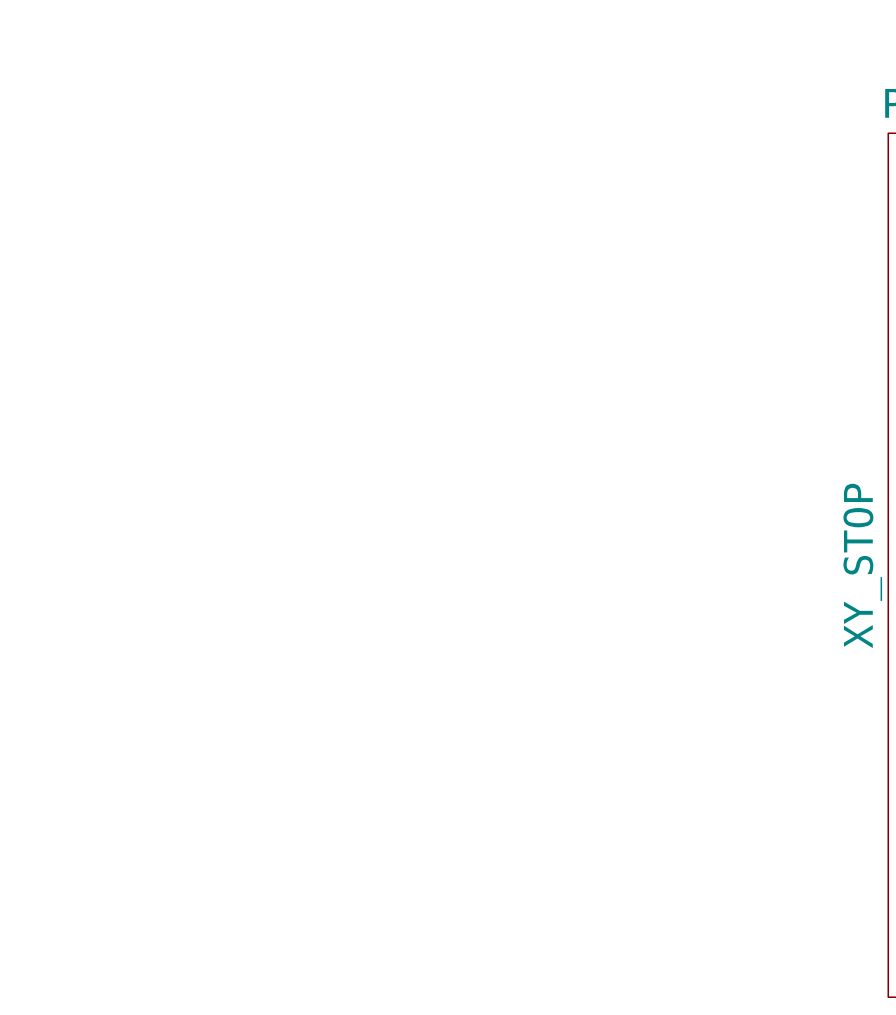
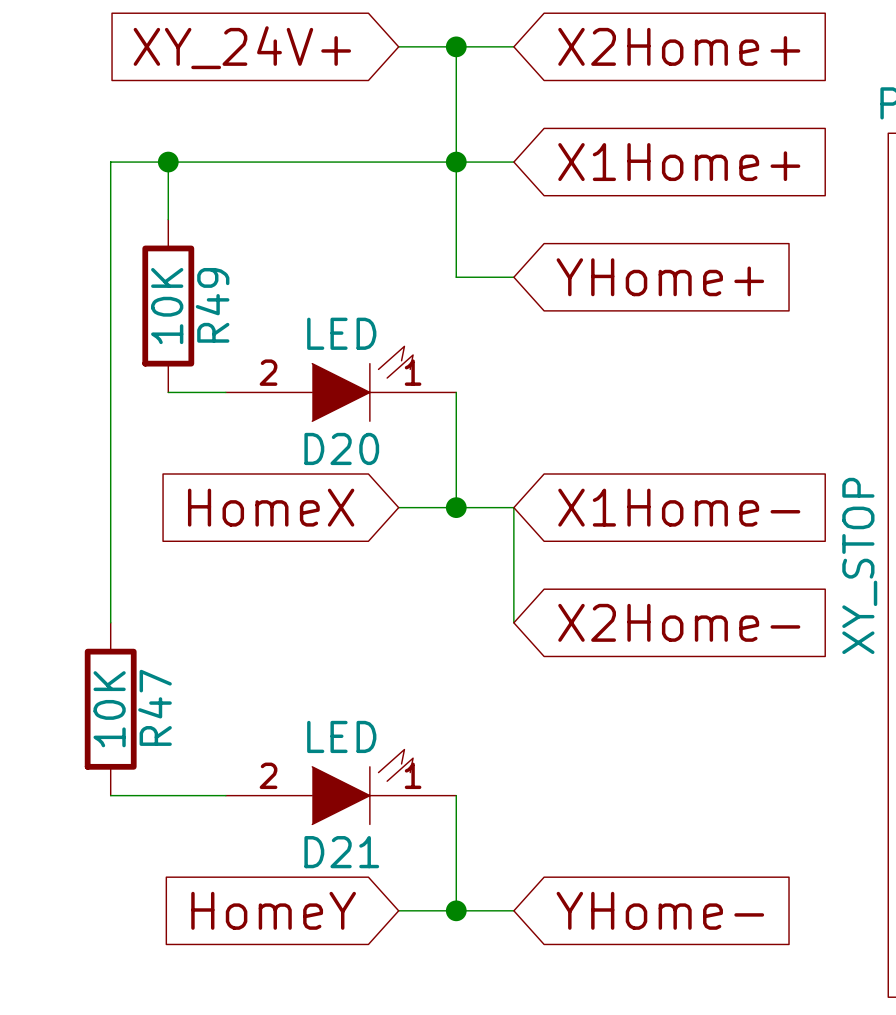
wire: none -> (398, 46) (513, 46)
wire: none -> (456, 46) (456, 277) (513, 277)
junction: none -> (456, 46)
global label: none -> X2Home+ (679, 46)
global label: none -> XY_24V+ (242, 47)
wire: none -> (168, 162) (168, 219)
junction: none -> (168, 162)
junction: none -> (456, 162)
wire: none -> (513, 162) (110, 162) (110, 622)
global label: none -> X1Home+ (679, 162)
global label: none -> YHome+ (660, 277)
R49: none -> 10K (168, 306)
D20: none -> LED (341, 383)
wire: none -> (168, 392) (225, 392)
wire: none -> (456, 392) (456, 507)
global label: none -> HomeX (271, 507)
wire: none -> (398, 507) (513, 507) (513, 622)
junction: none -> (456, 507)
global label: none -> X1Home- (679, 507)
global label: none -> X2Home- (679, 622)
R47: none -> 10K (110, 709)
D21: none -> LED (341, 786)
wire: none -> (110, 795) (225, 795)
wire: none -> (456, 795) (456, 910)
wire: none -> (398, 910) (513, 910)
junction: none -> (456, 910)
global label: none -> HomeY (273, 910)
global label: none -> YHome- (660, 910)

